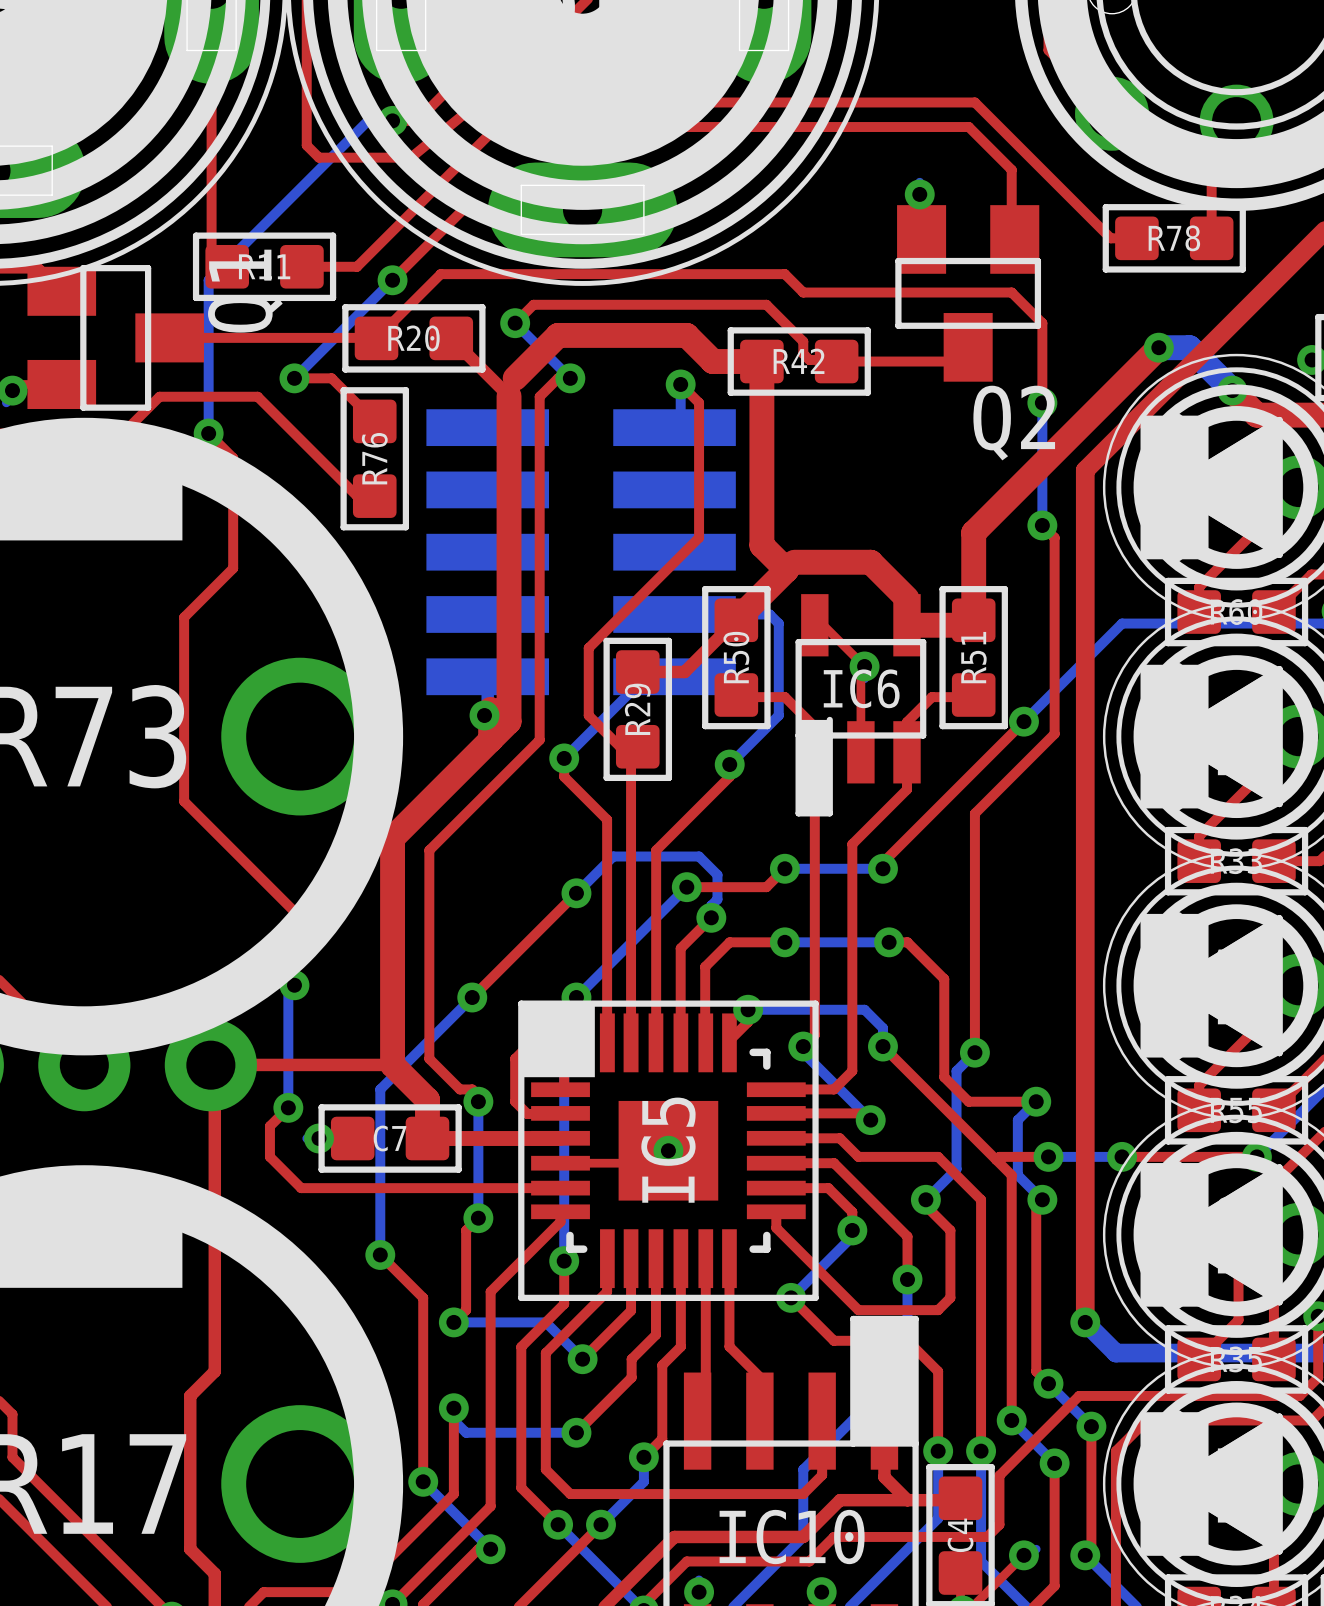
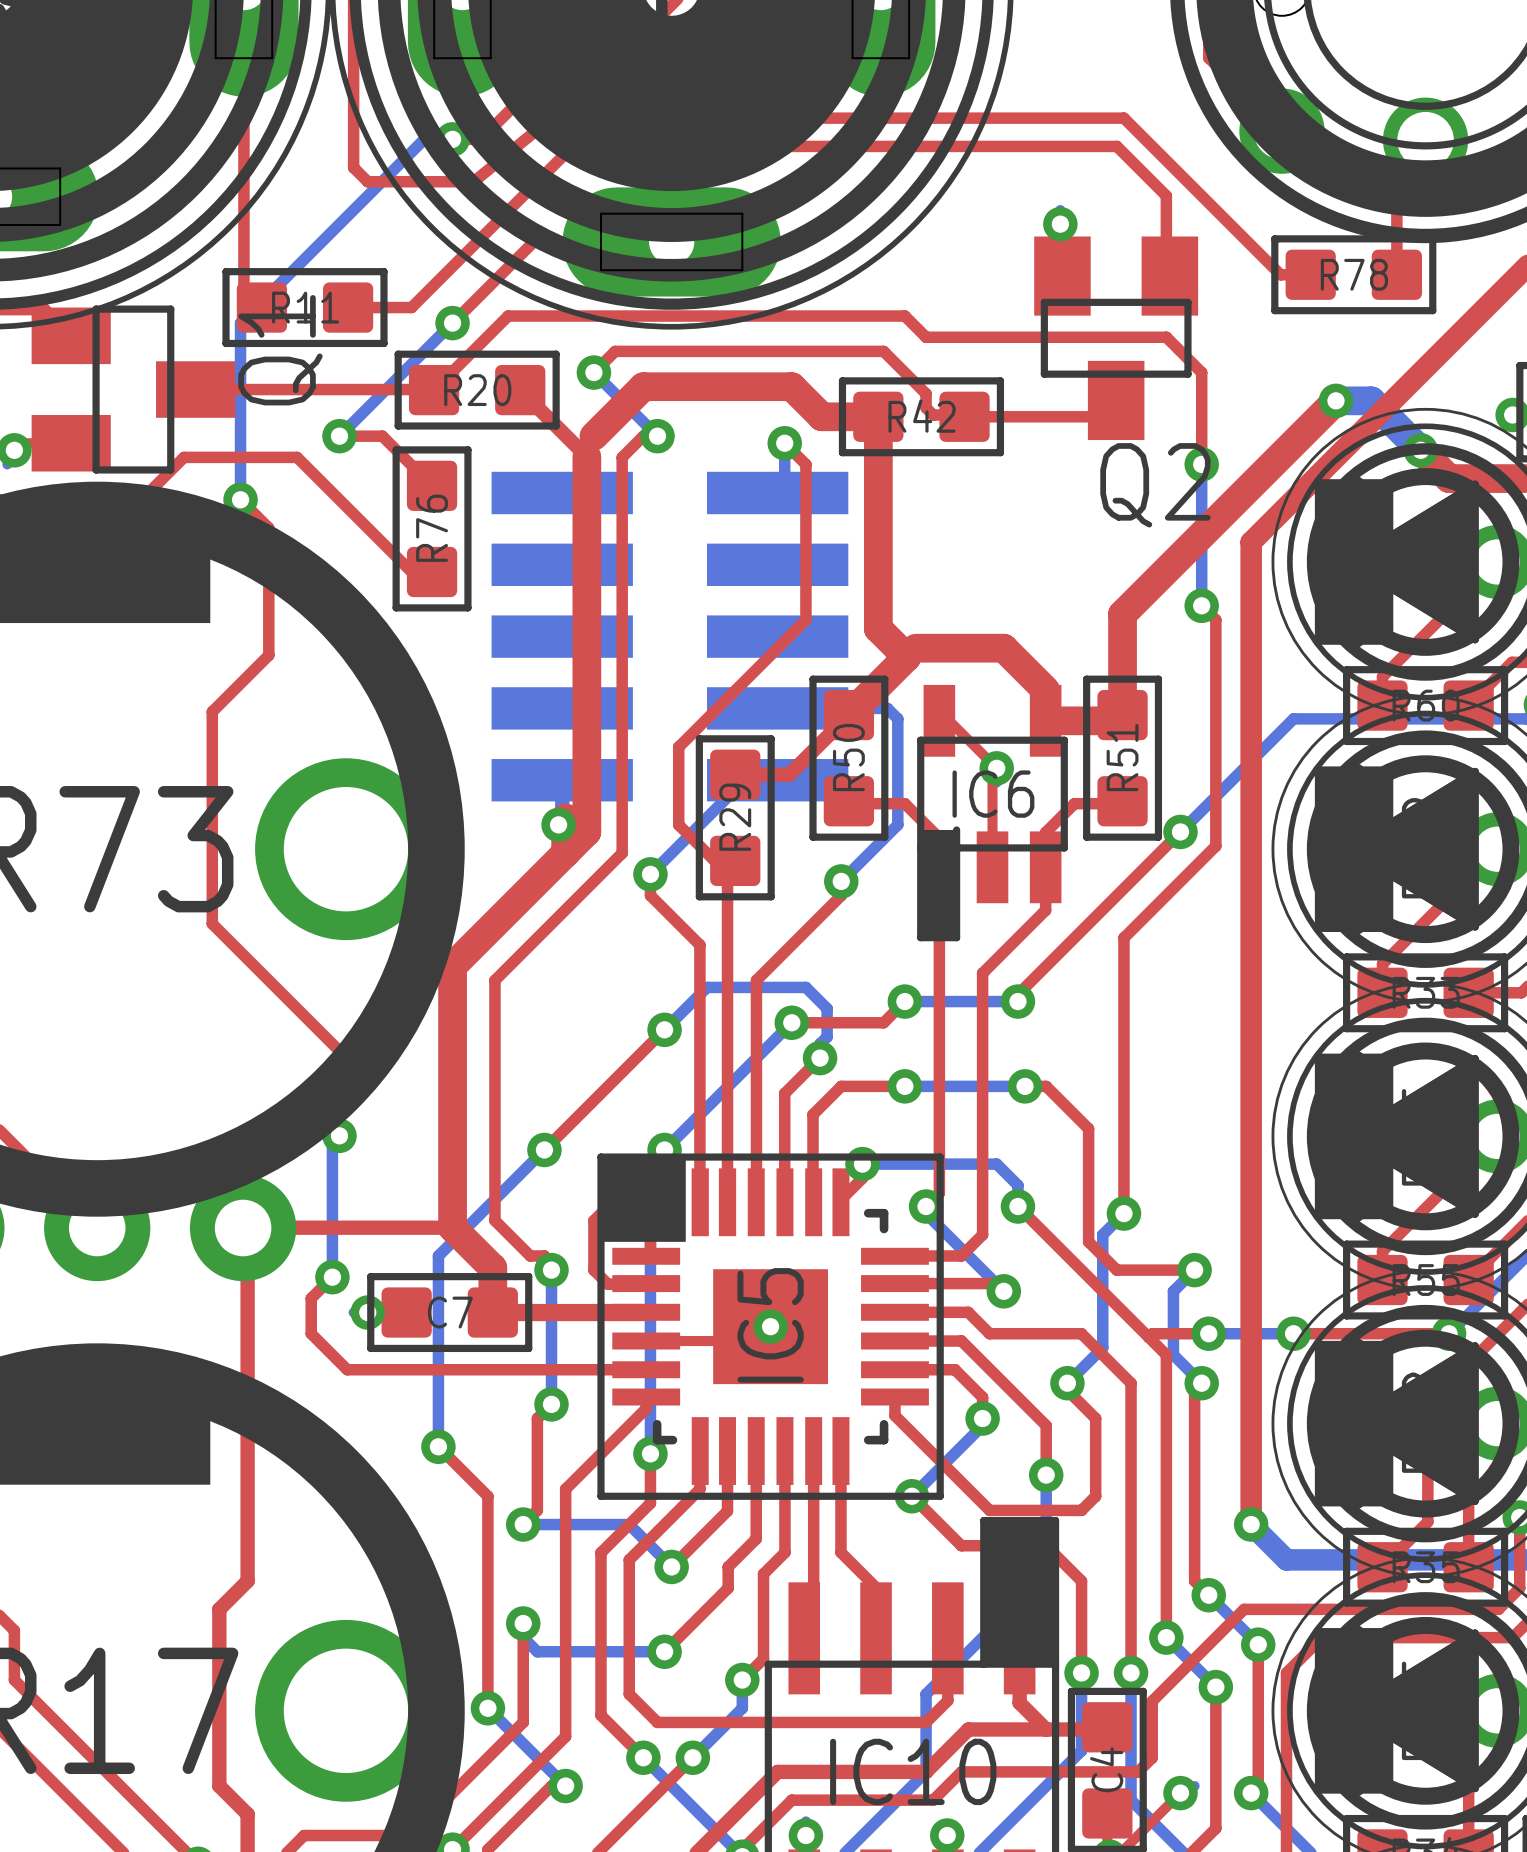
Q2 footprint: [895, 205, 1042, 382] -> [1034, 236, 1199, 441]

